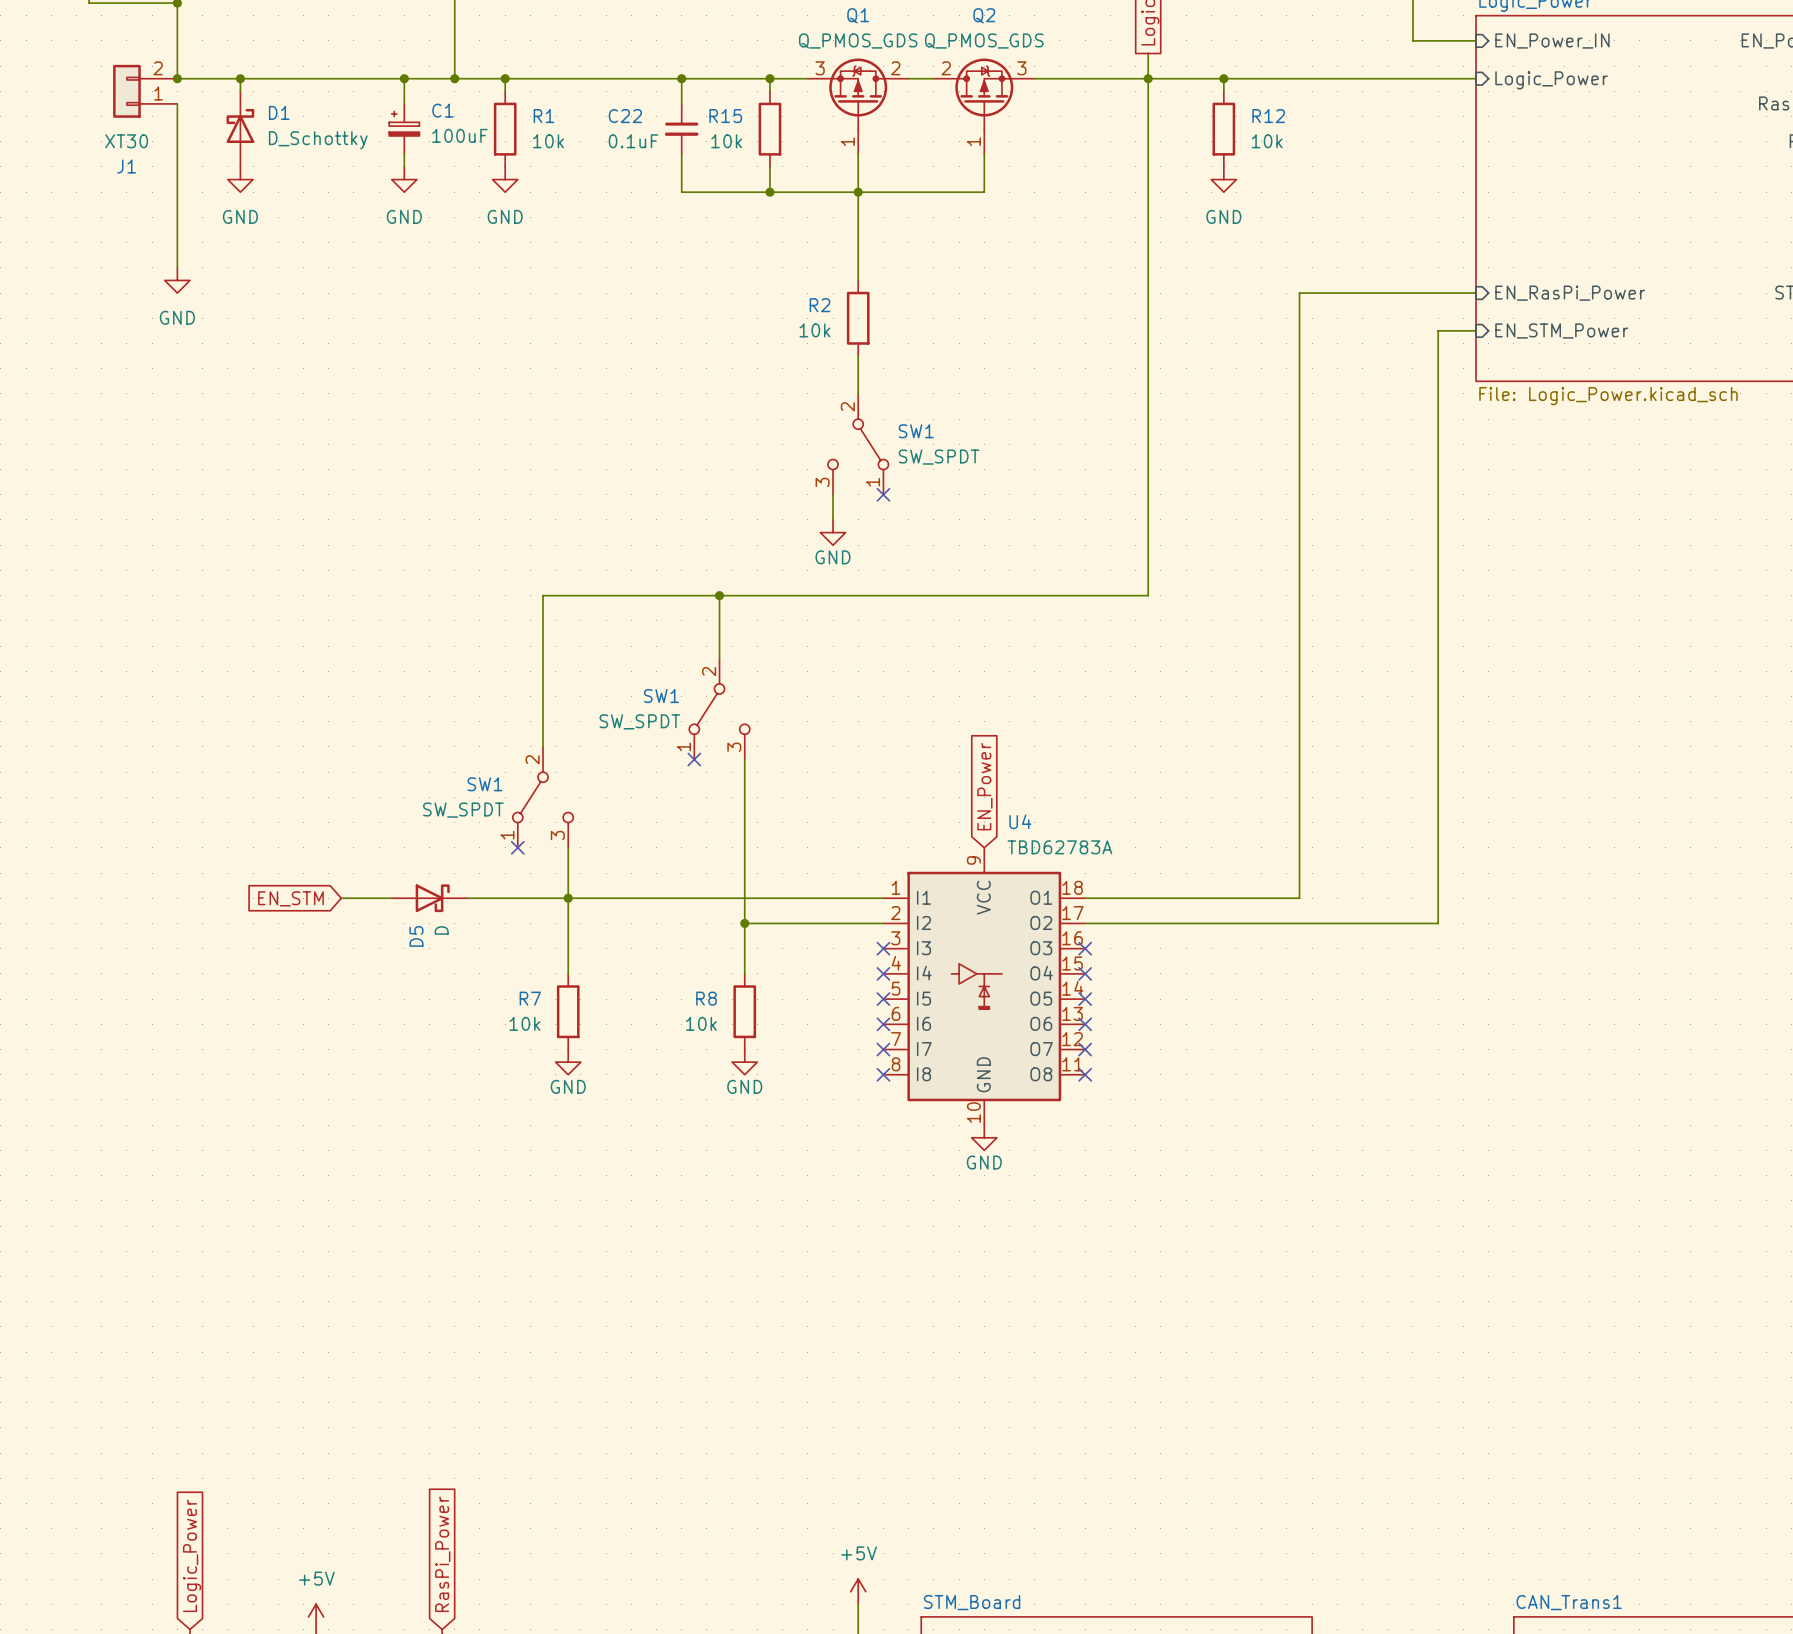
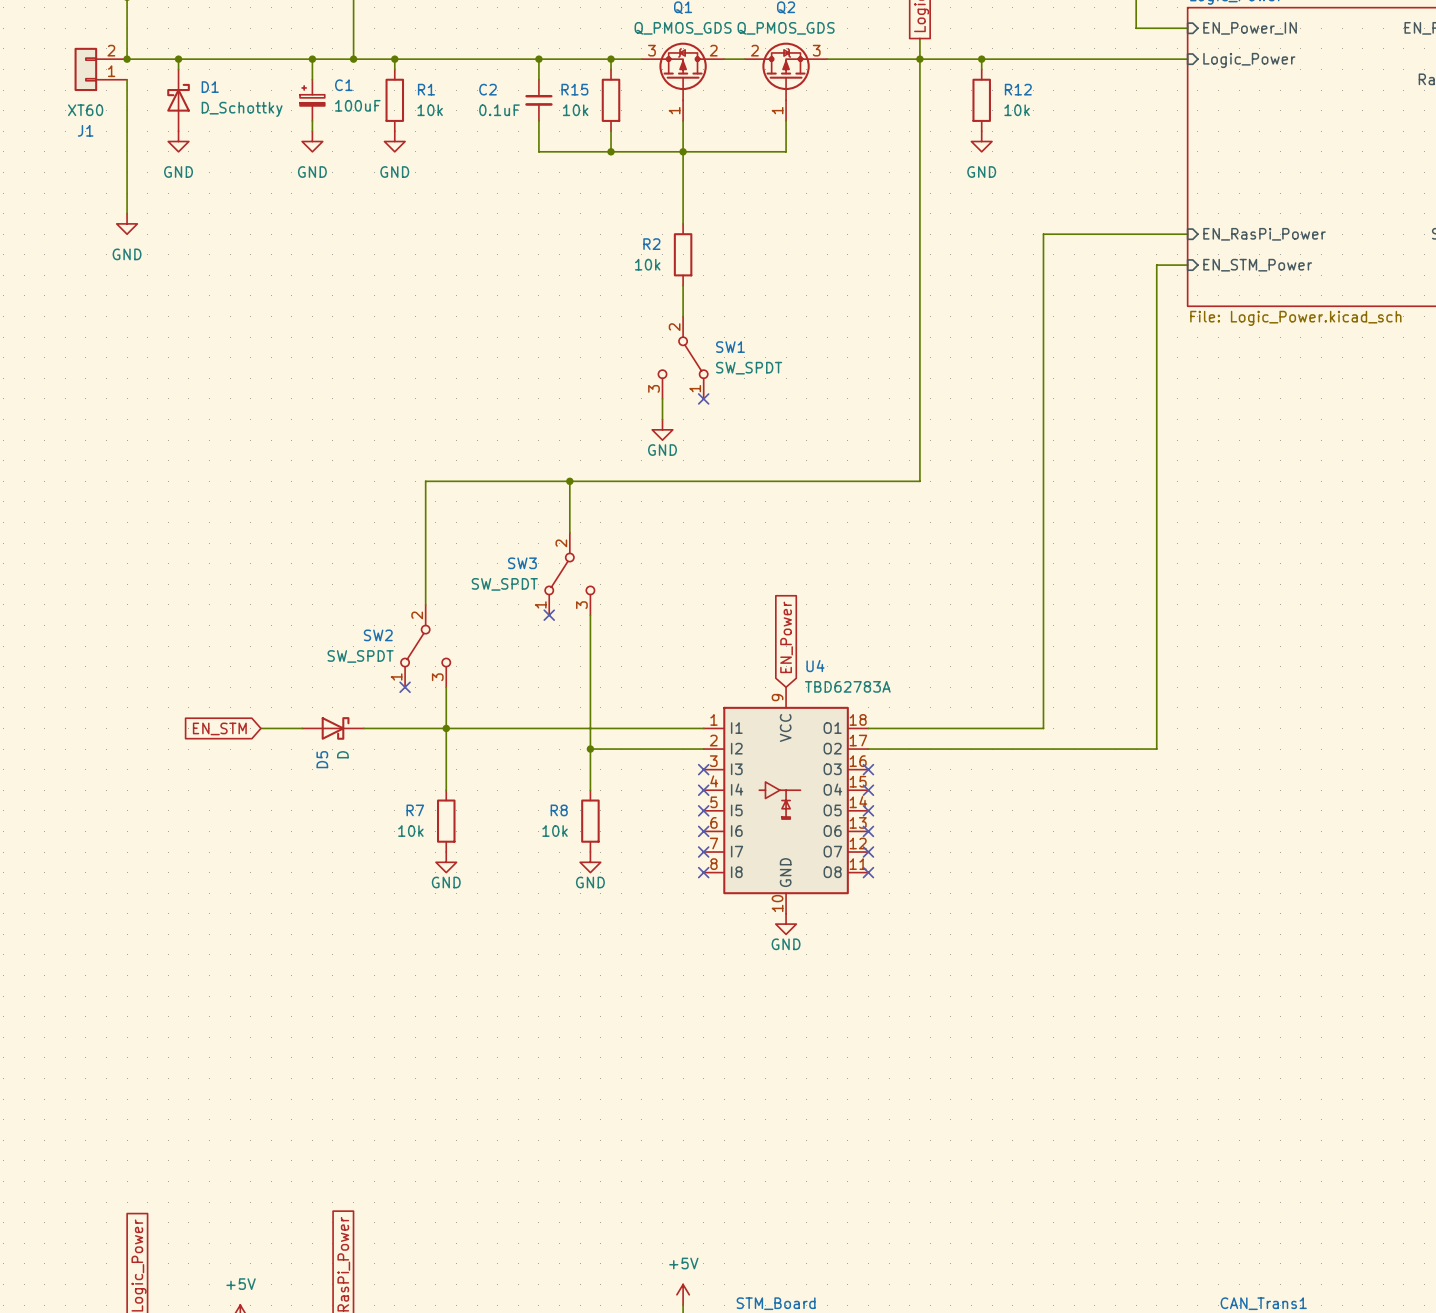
C22 name: C22 (625, 116) -> C2 (488, 89)
J1 value: XT30 (126, 141) -> XT60 (85, 110)
SW1 name: SW1 (661, 696) -> SW3 (522, 563)
SW1 name: SW1 (484, 784) -> SW2 (378, 635)

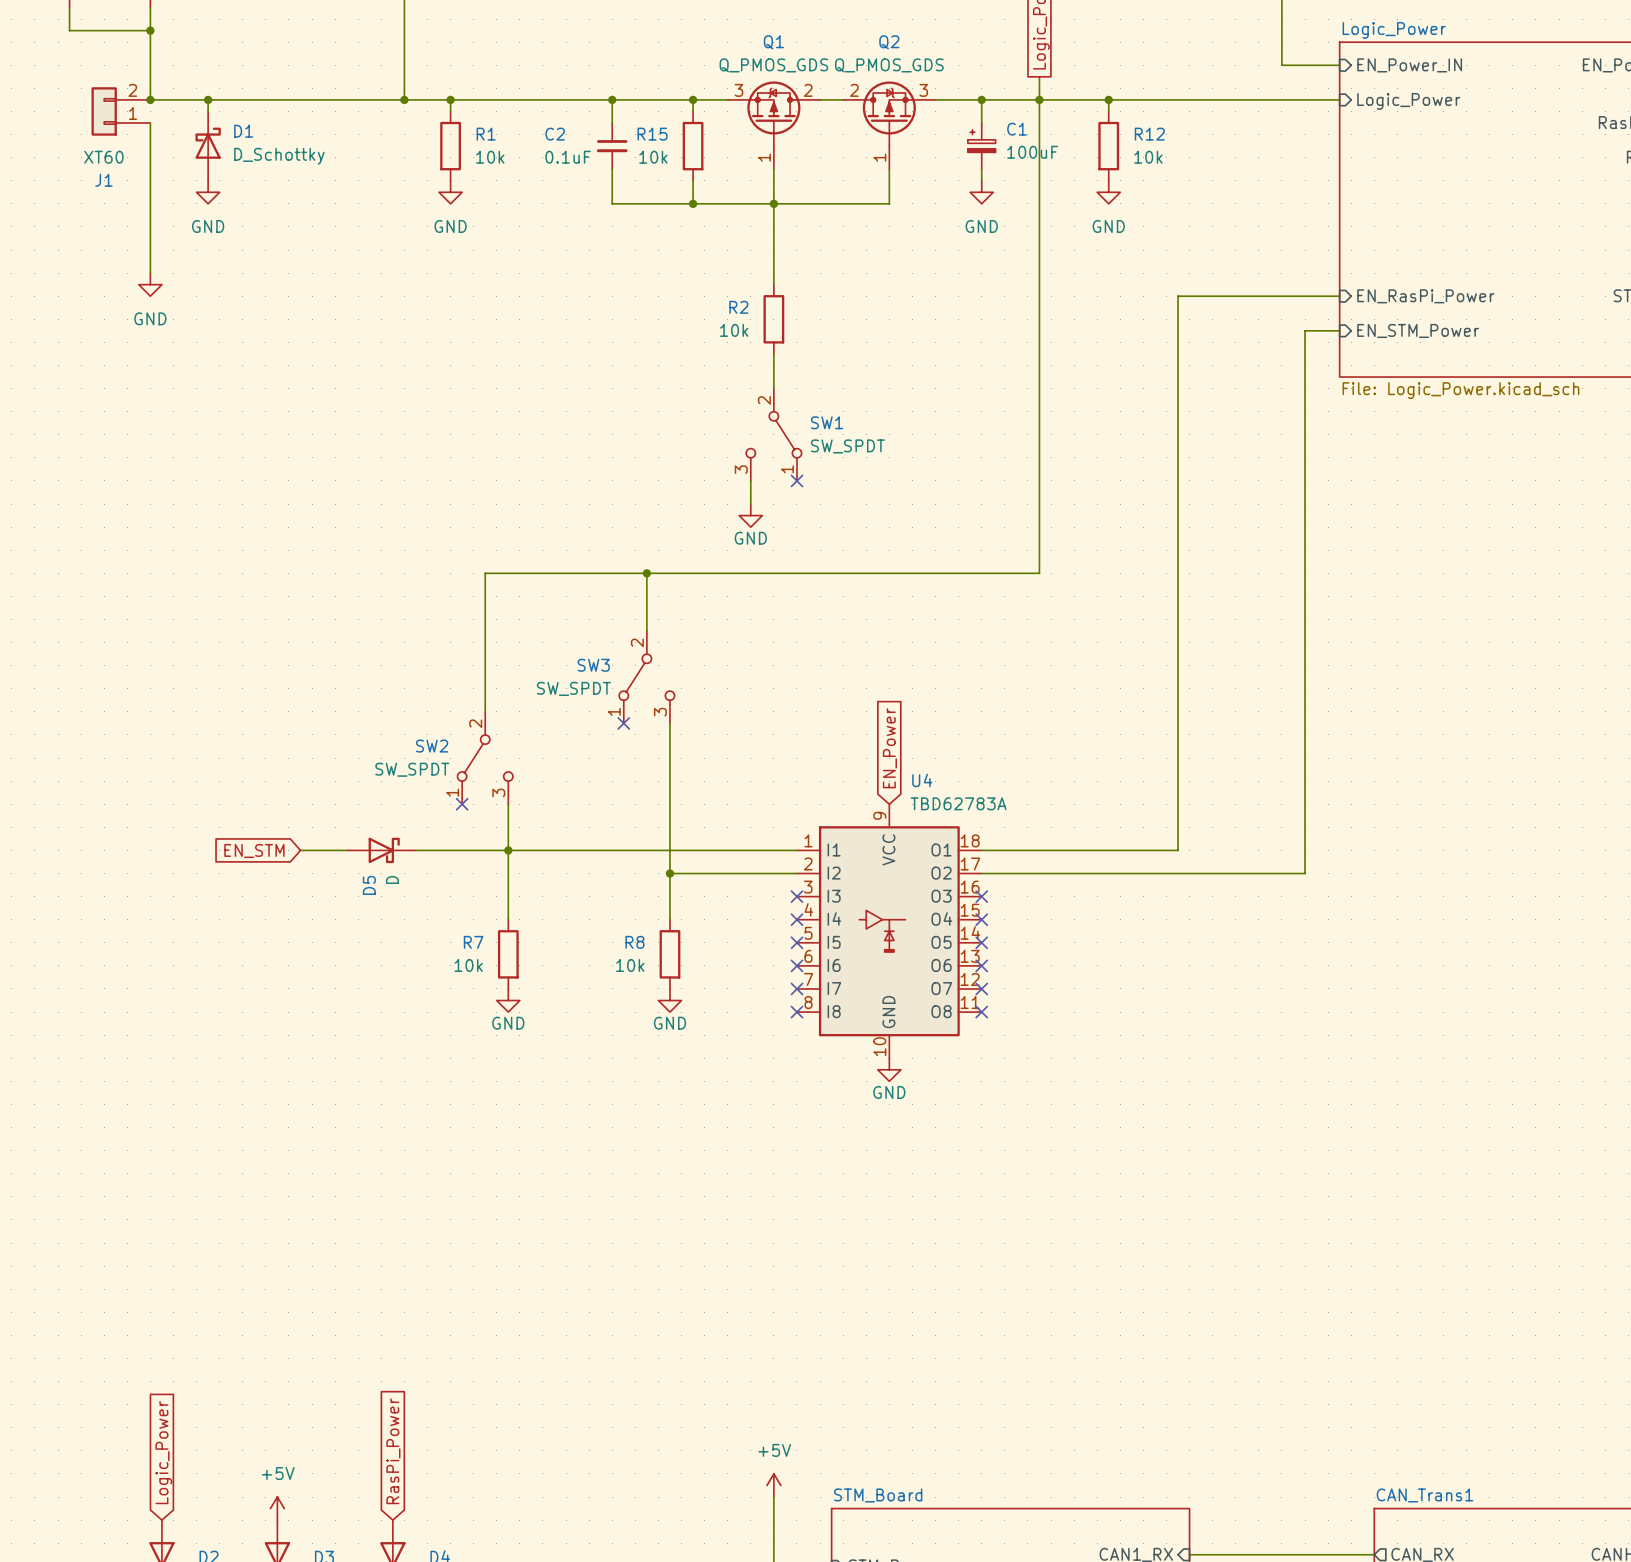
wire: (312, 59) (312, 79) -> none
junction: (312, 59) -> none
wire: none -> (981, 99) (981, 123)
junction: none -> (981, 99)
C1 position: (312, 100) -> (981, 146)
wire: (312, 120) (312, 131) -> none
wire: none -> (981, 169) (981, 180)
power symbol: GND (312, 141) -> none
power symbol: none -> GND (981, 192)

